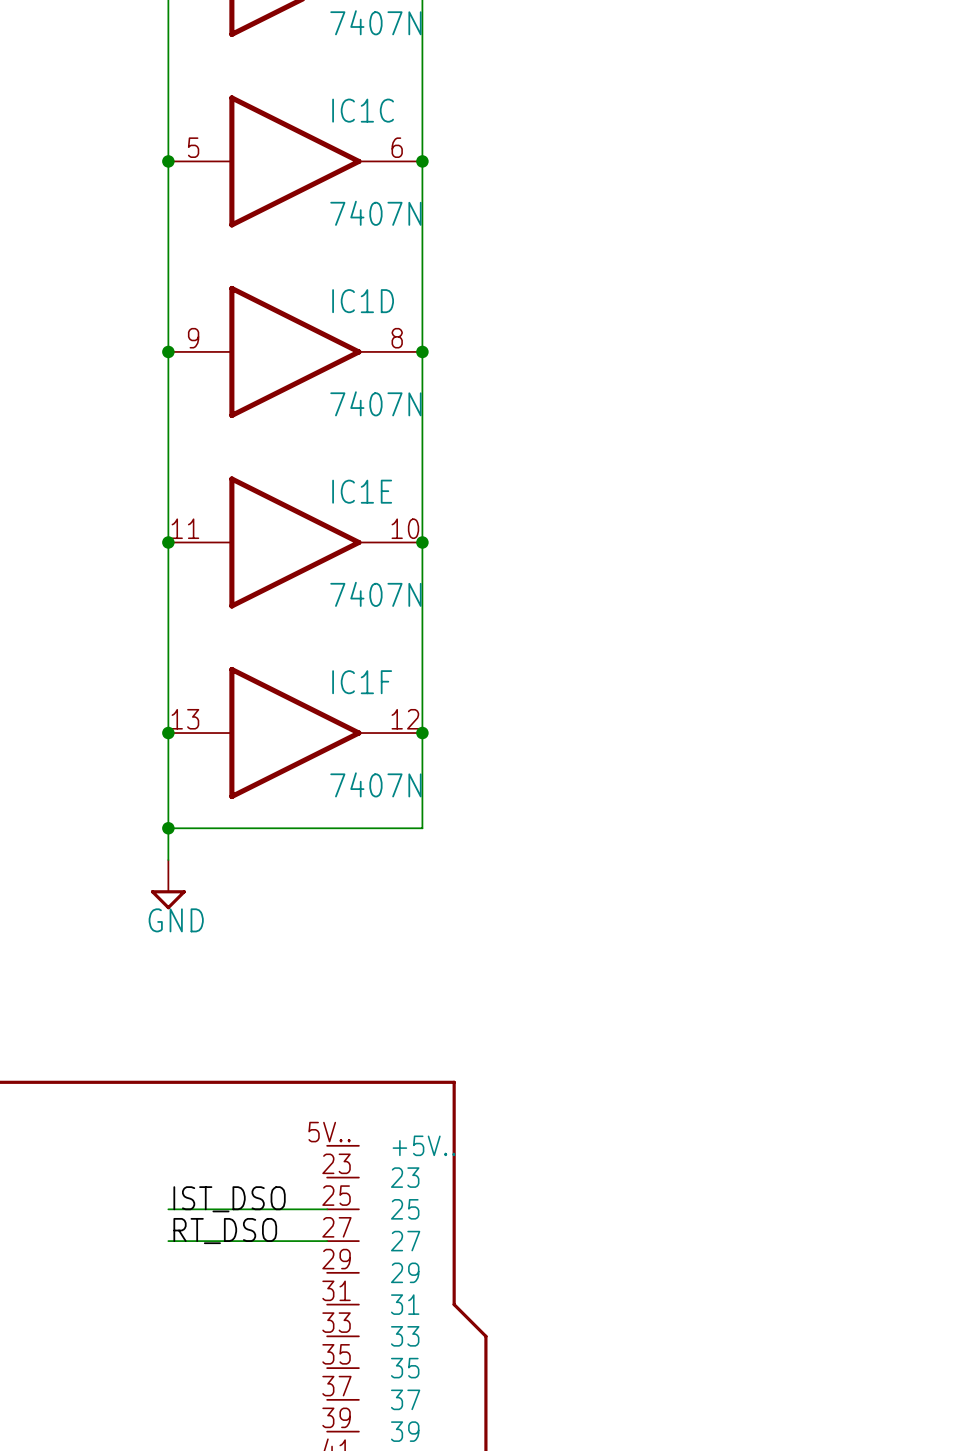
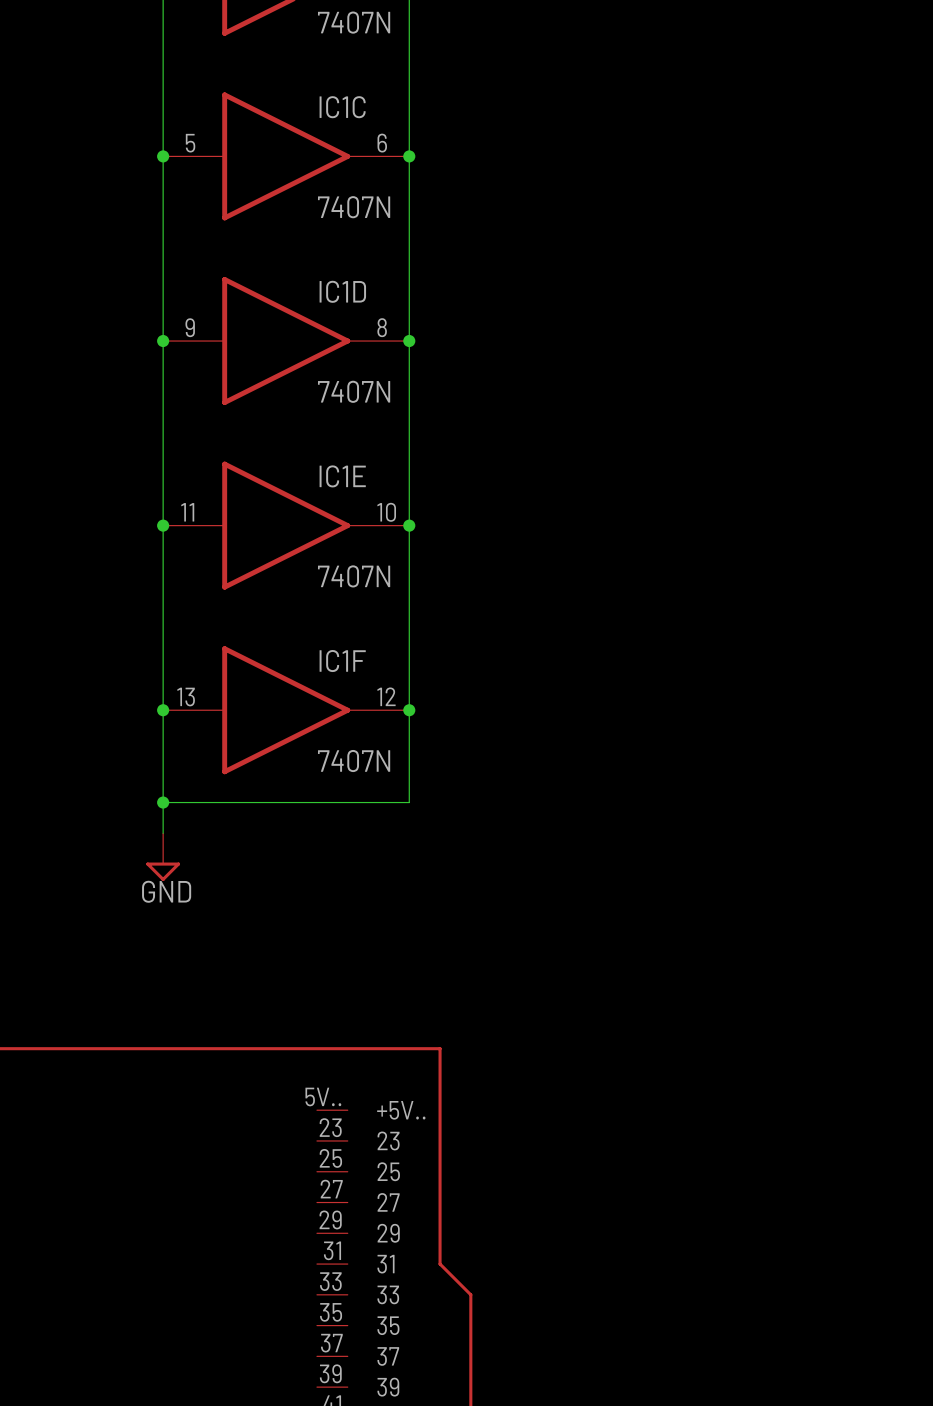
label: IST_DSO (229, 1199) -> none
wire: (168, 1209) (327, 1209) -> none
label: RT_DSO (225, 1231) -> none
wire: (168, 1241) (327, 1241) -> none

